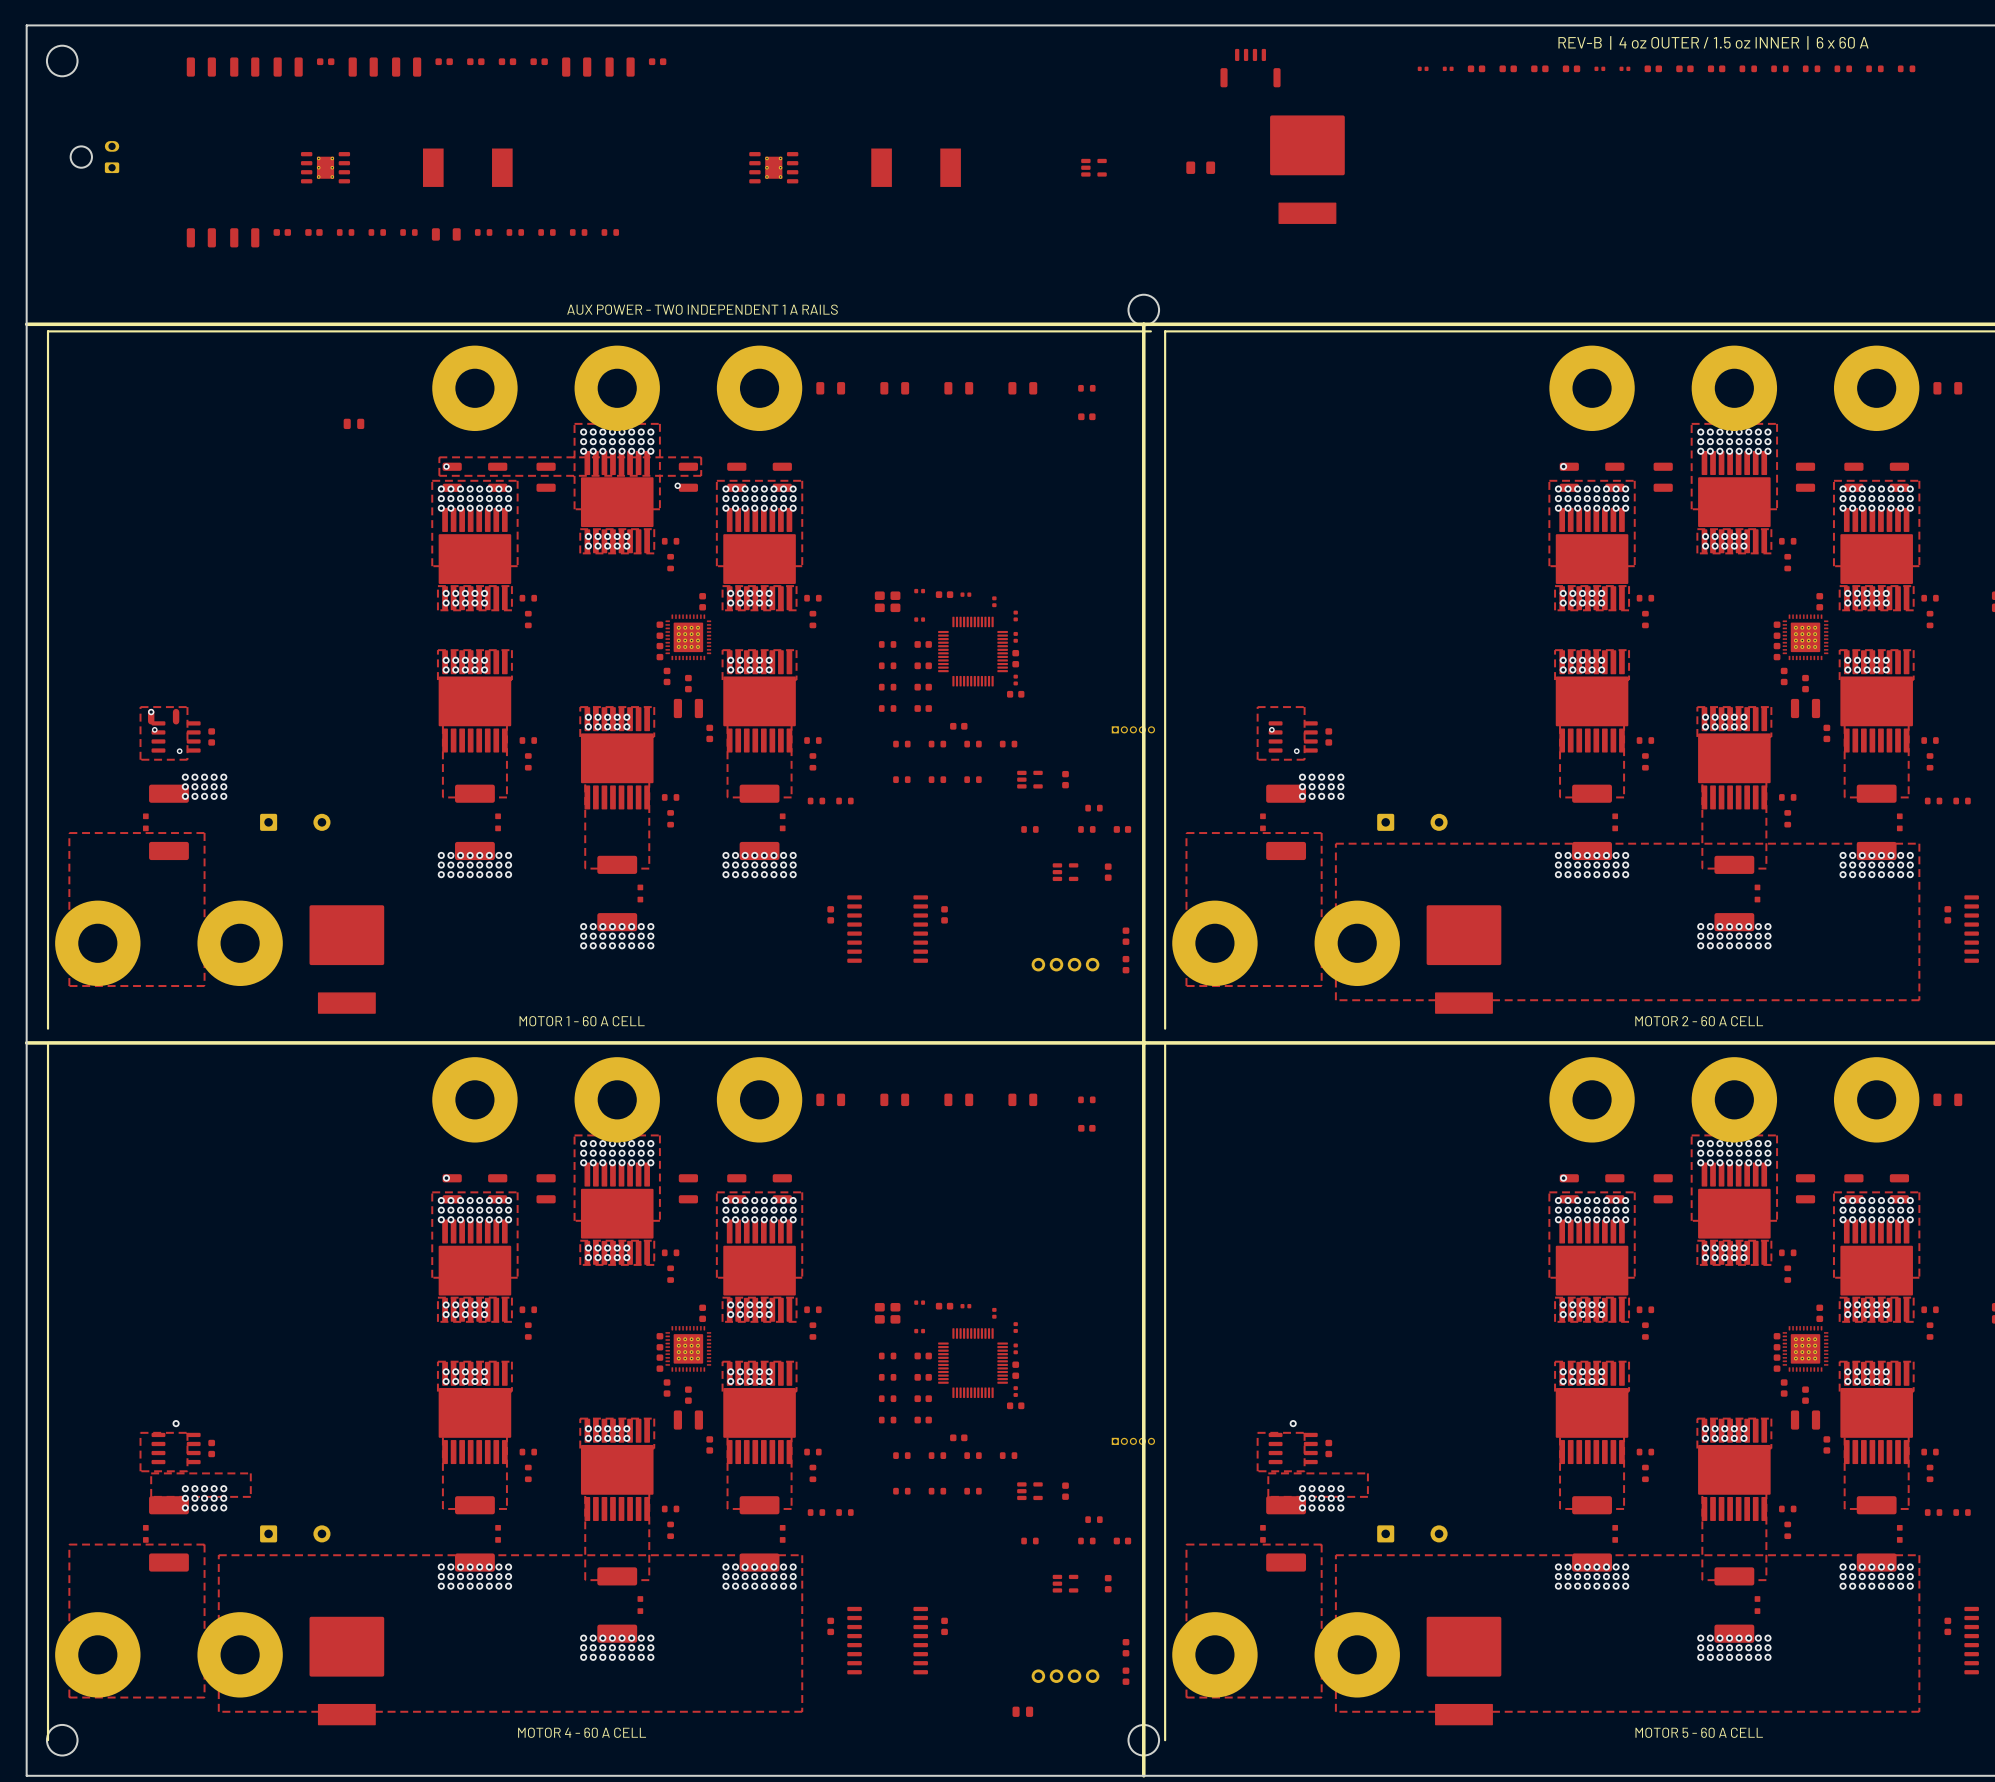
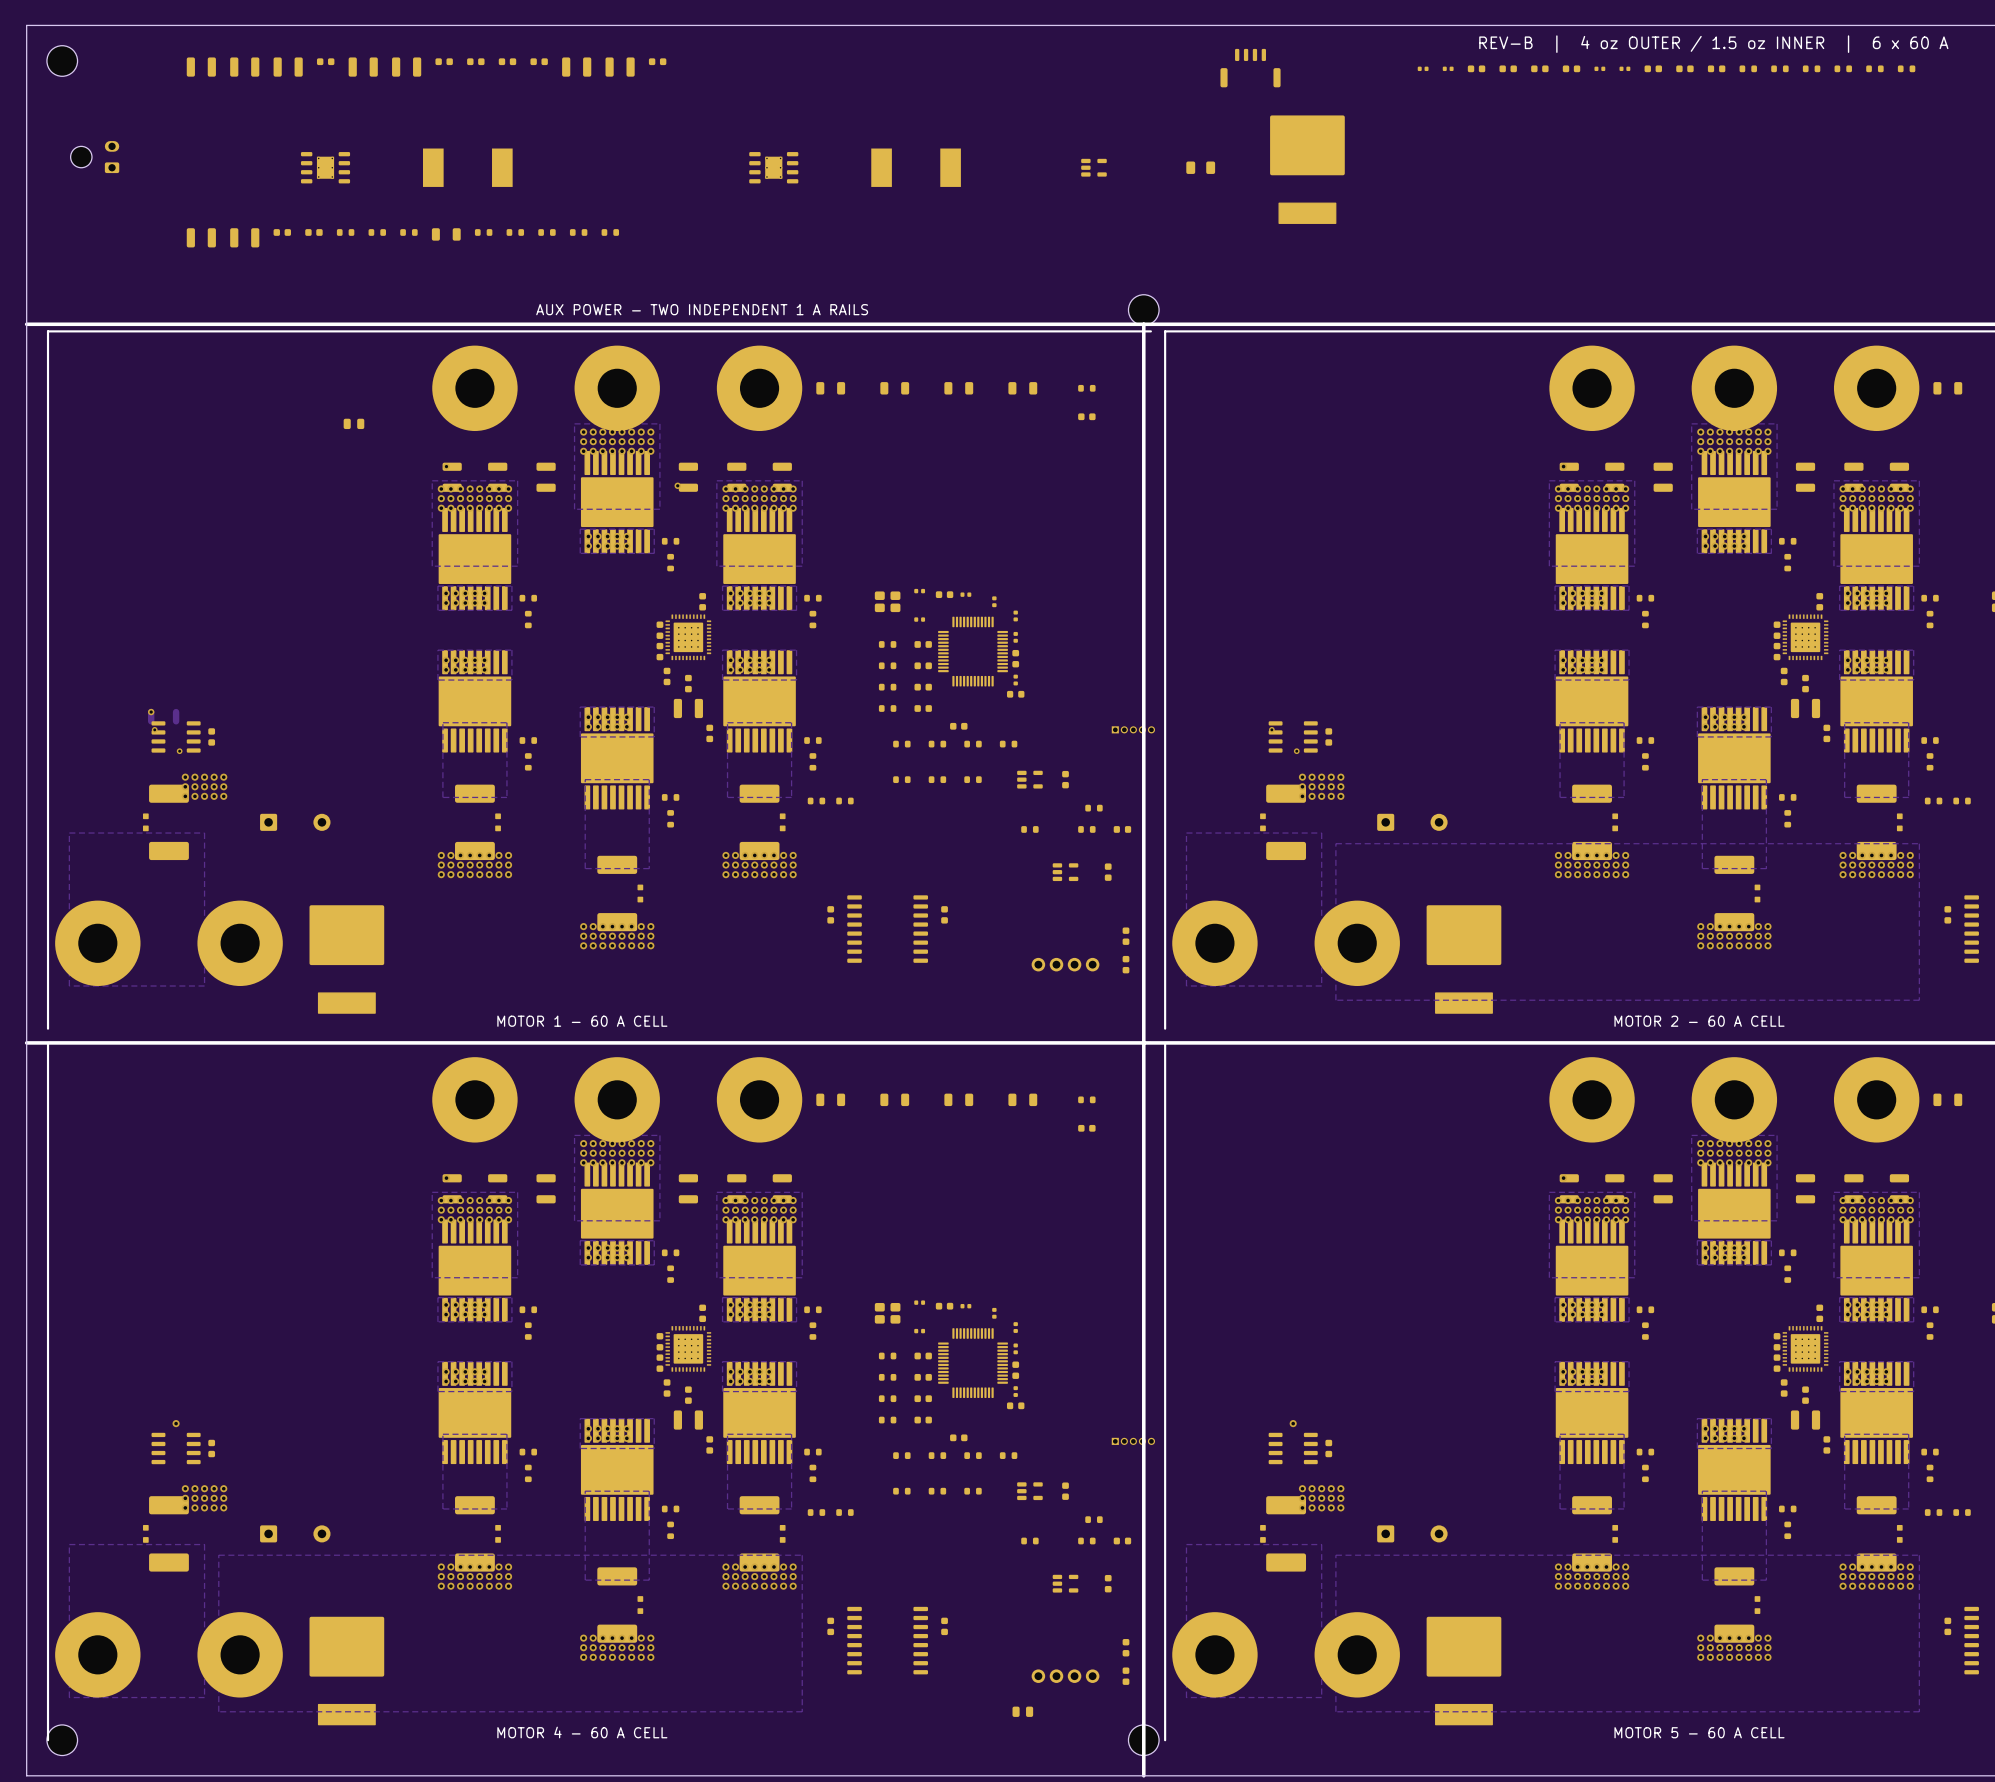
zone outline: (439, 457) (701, 457) (701, 475) (439, 475) (439, 457) -> none
zone outline: (140, 707) (140, 759) (187, 759) (187, 707) (140, 707) -> none
zone outline: (1257, 707) (1257, 759) (1304, 759) (1304, 707) (1257, 707) -> none
zone outline: (140, 1432) (187, 1432) (187, 1471) (140, 1471) (140, 1432) -> none
zone outline: (1257, 1432) (1304, 1432) (1304, 1471) (1257, 1471) (1257, 1432) -> none
zone outline: (151, 1473) (250, 1473) (250, 1496) (151, 1496) (151, 1473) -> none
zone outline: (1268, 1473) (1367, 1473) (1367, 1496) (1268, 1496) (1268, 1473) -> none

